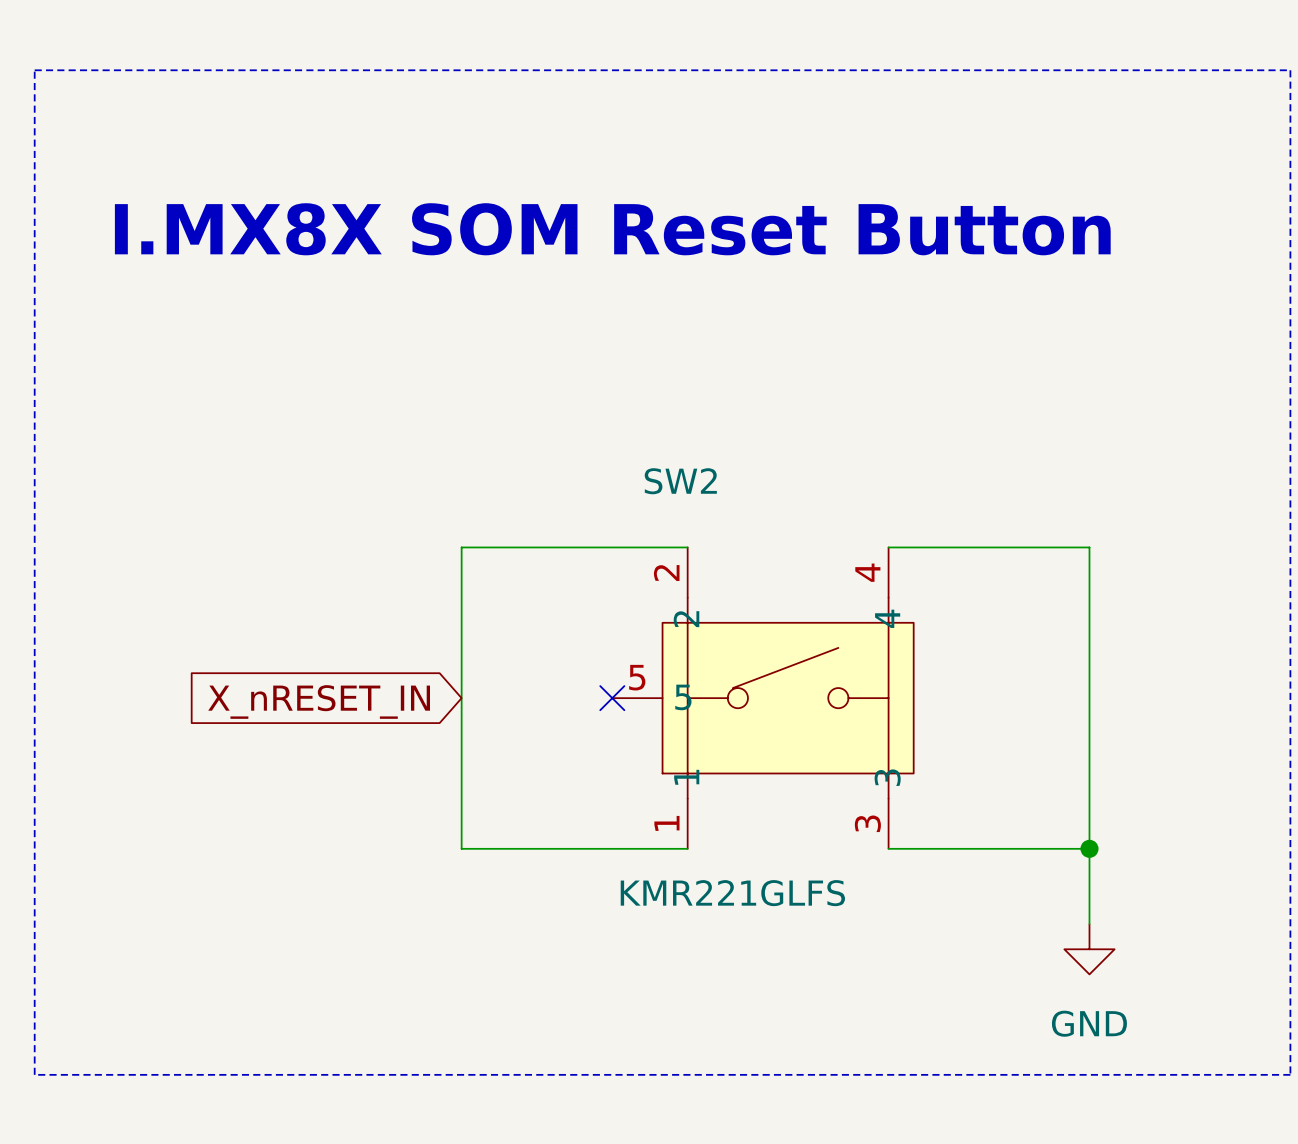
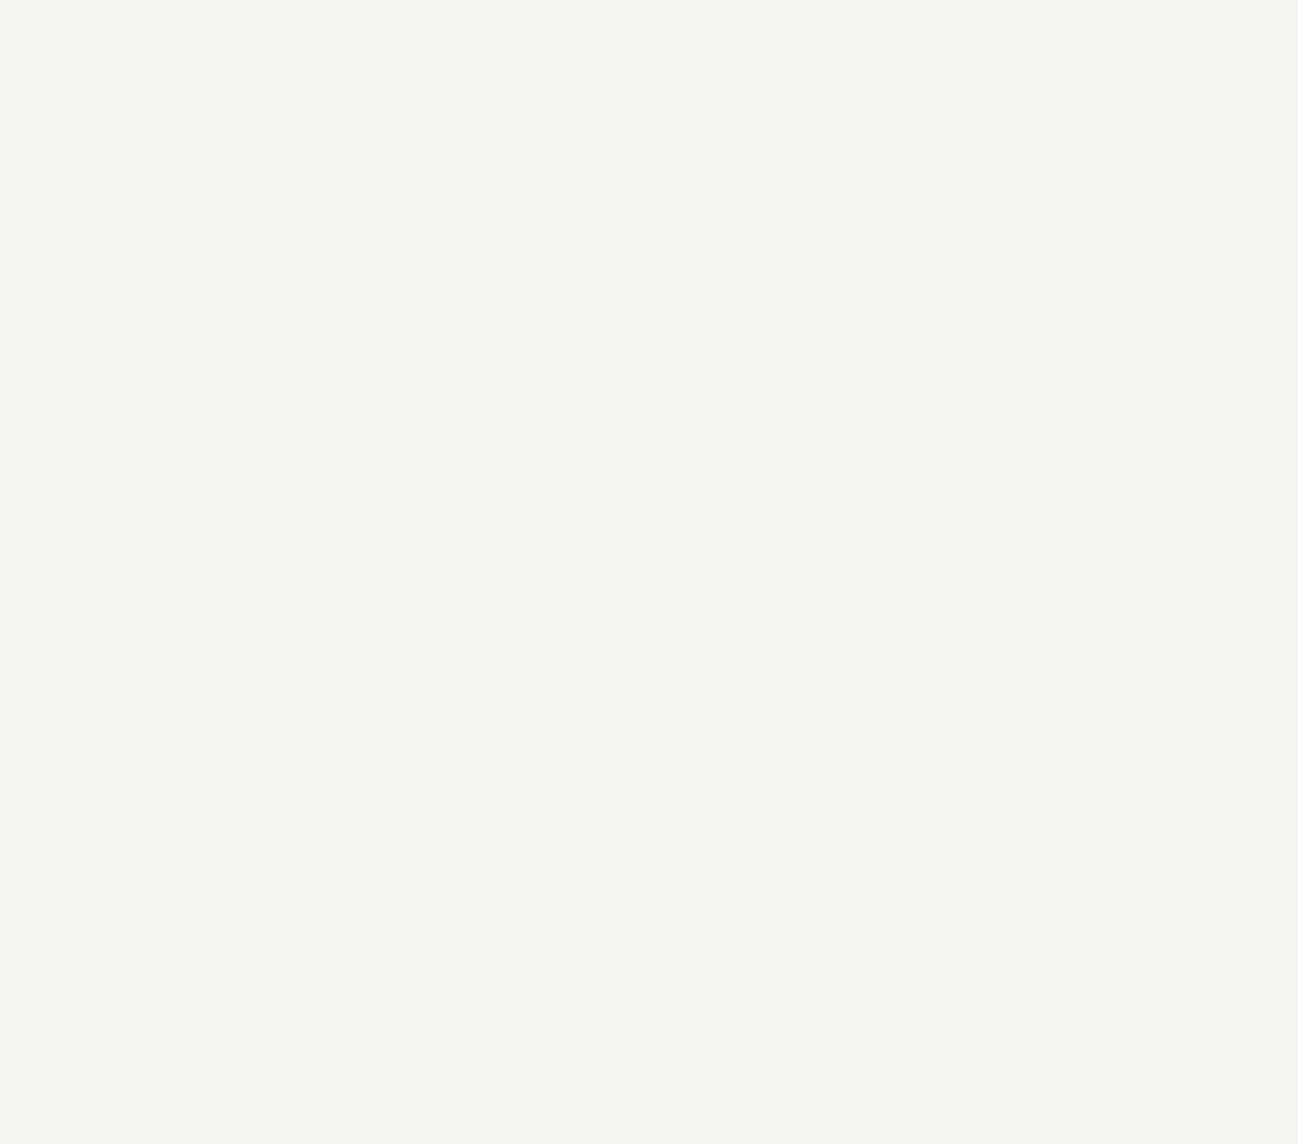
line: (34, 70) (1290, 70) (1290, 1074) (34, 1074) (34, 70) -> none
text: I.MX8X SOM Reset Button (612, 229) -> none
wire: (687, 547) (461, 547) (461, 848) (687, 848) -> none
wire: (888, 547) (1089, 547) (1089, 924) -> none
no-connect mark: (612, 698) -> none
SW2: KMR221GLFS (763, 698) -> none
global label: X_nRESET_IN (319, 701) -> none
wire: (888, 848) (1089, 848) -> none
junction: (1089, 848) -> none
power symbol: GND (1089, 949) -> none

